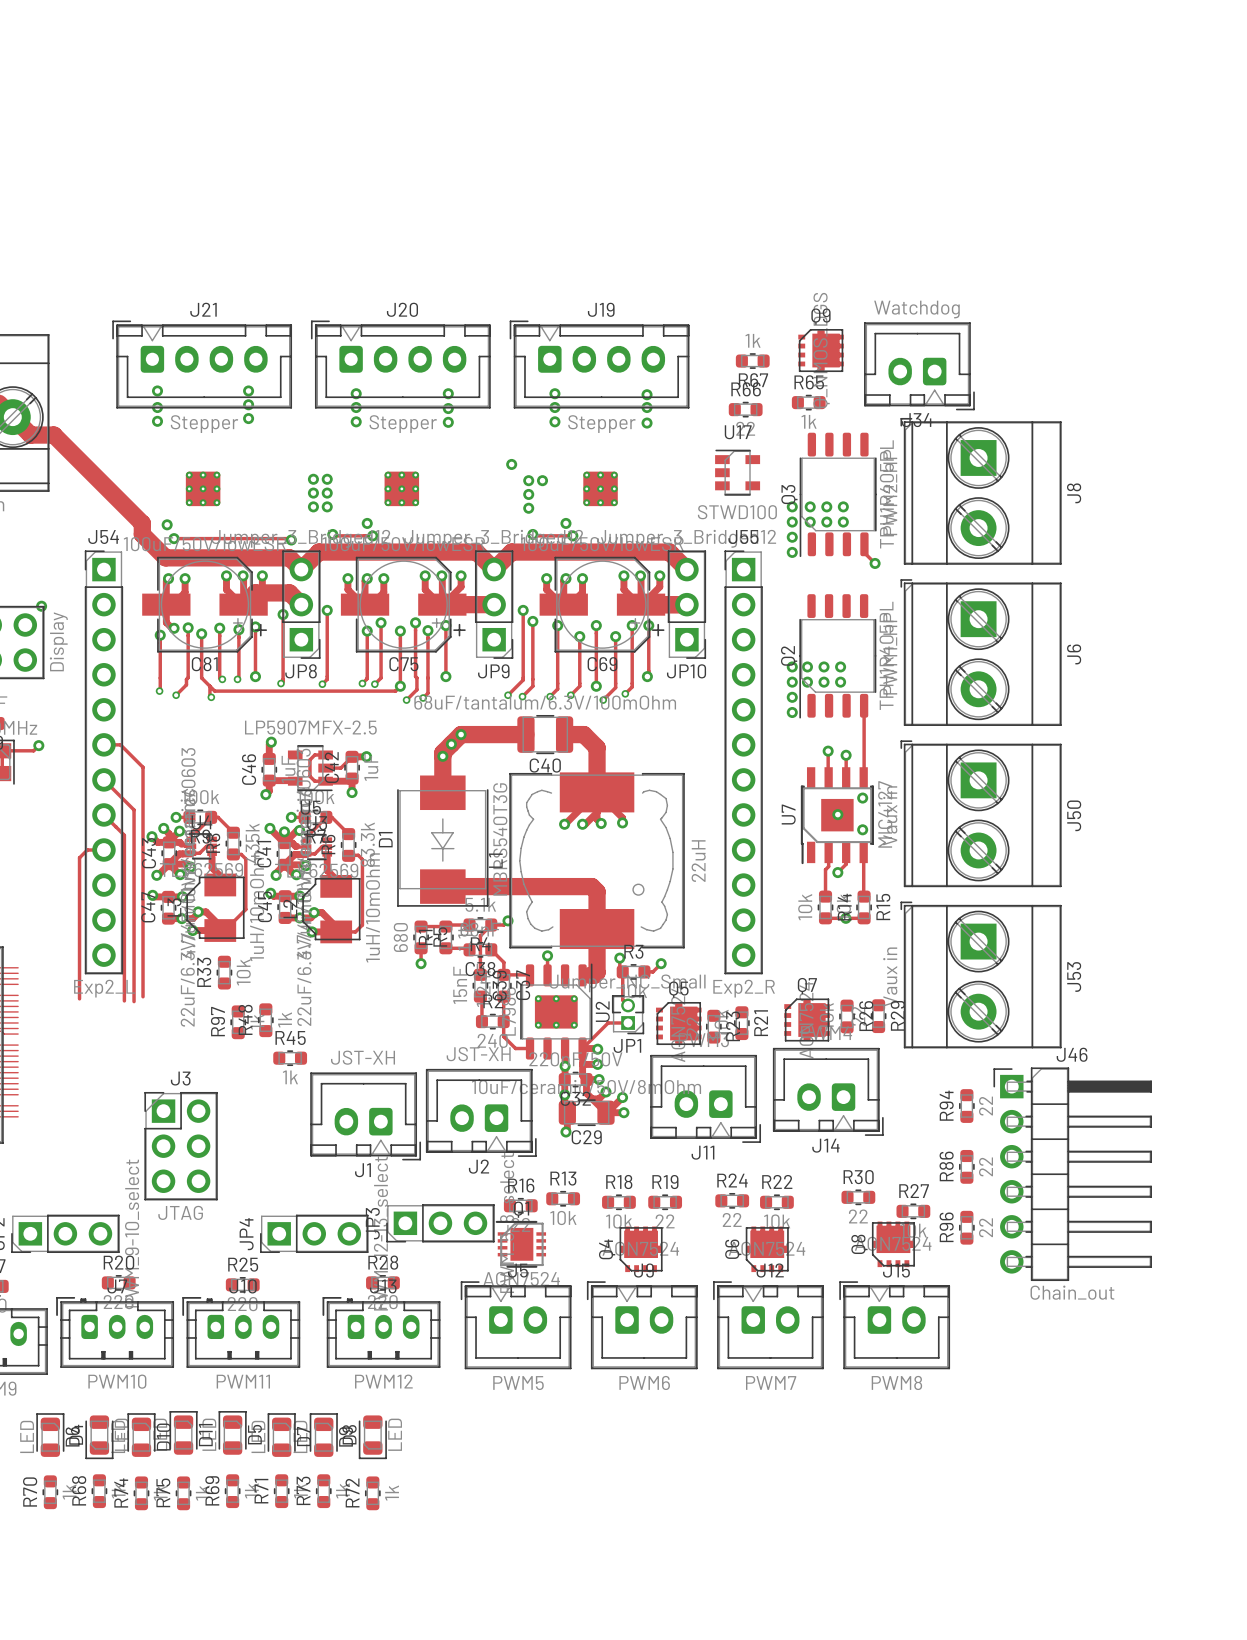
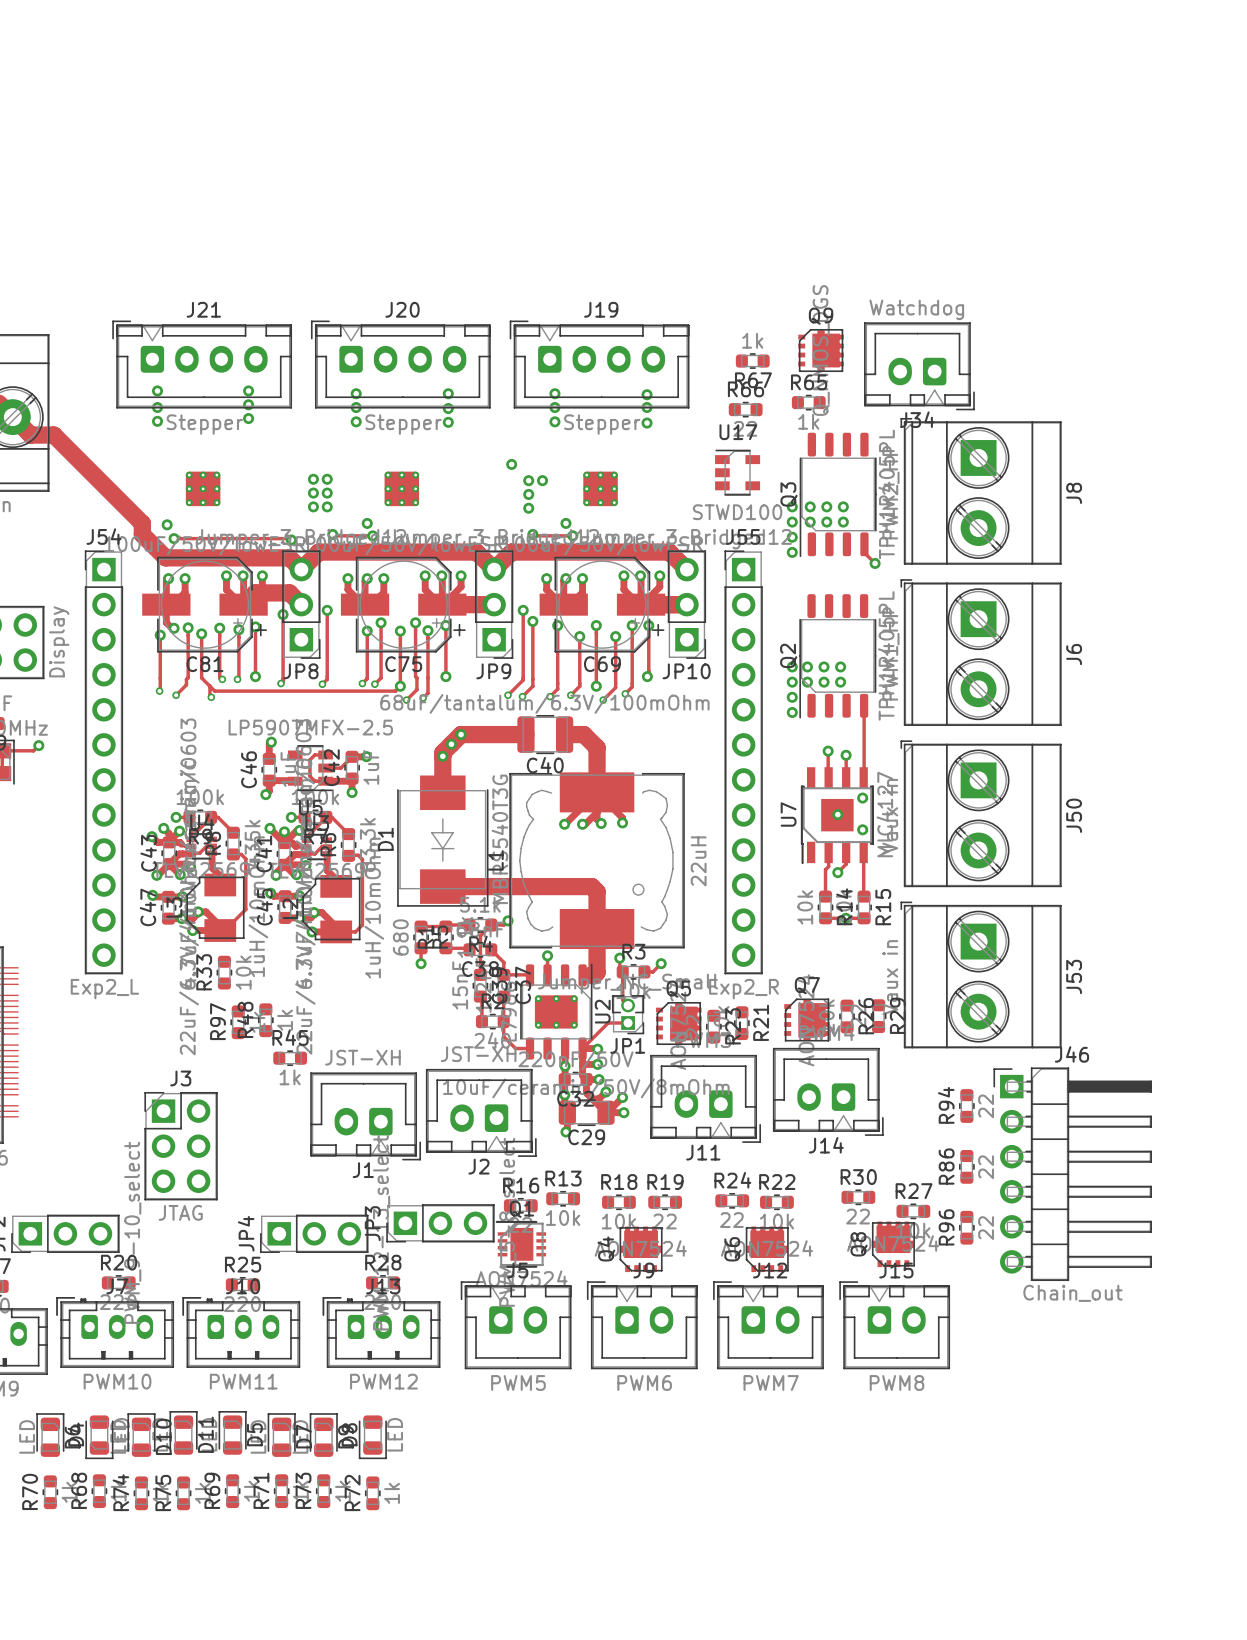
via: (41, 606) -> none
track: (103, 744) (120, 744) (143, 767) (143, 996) -> none
track: (103, 779) (134, 809) (134, 1001) -> none
track: (103, 814) (124, 835) (124, 1000) -> none
track: (103, 850) (87, 850) (79, 857) (79, 998) -> none

